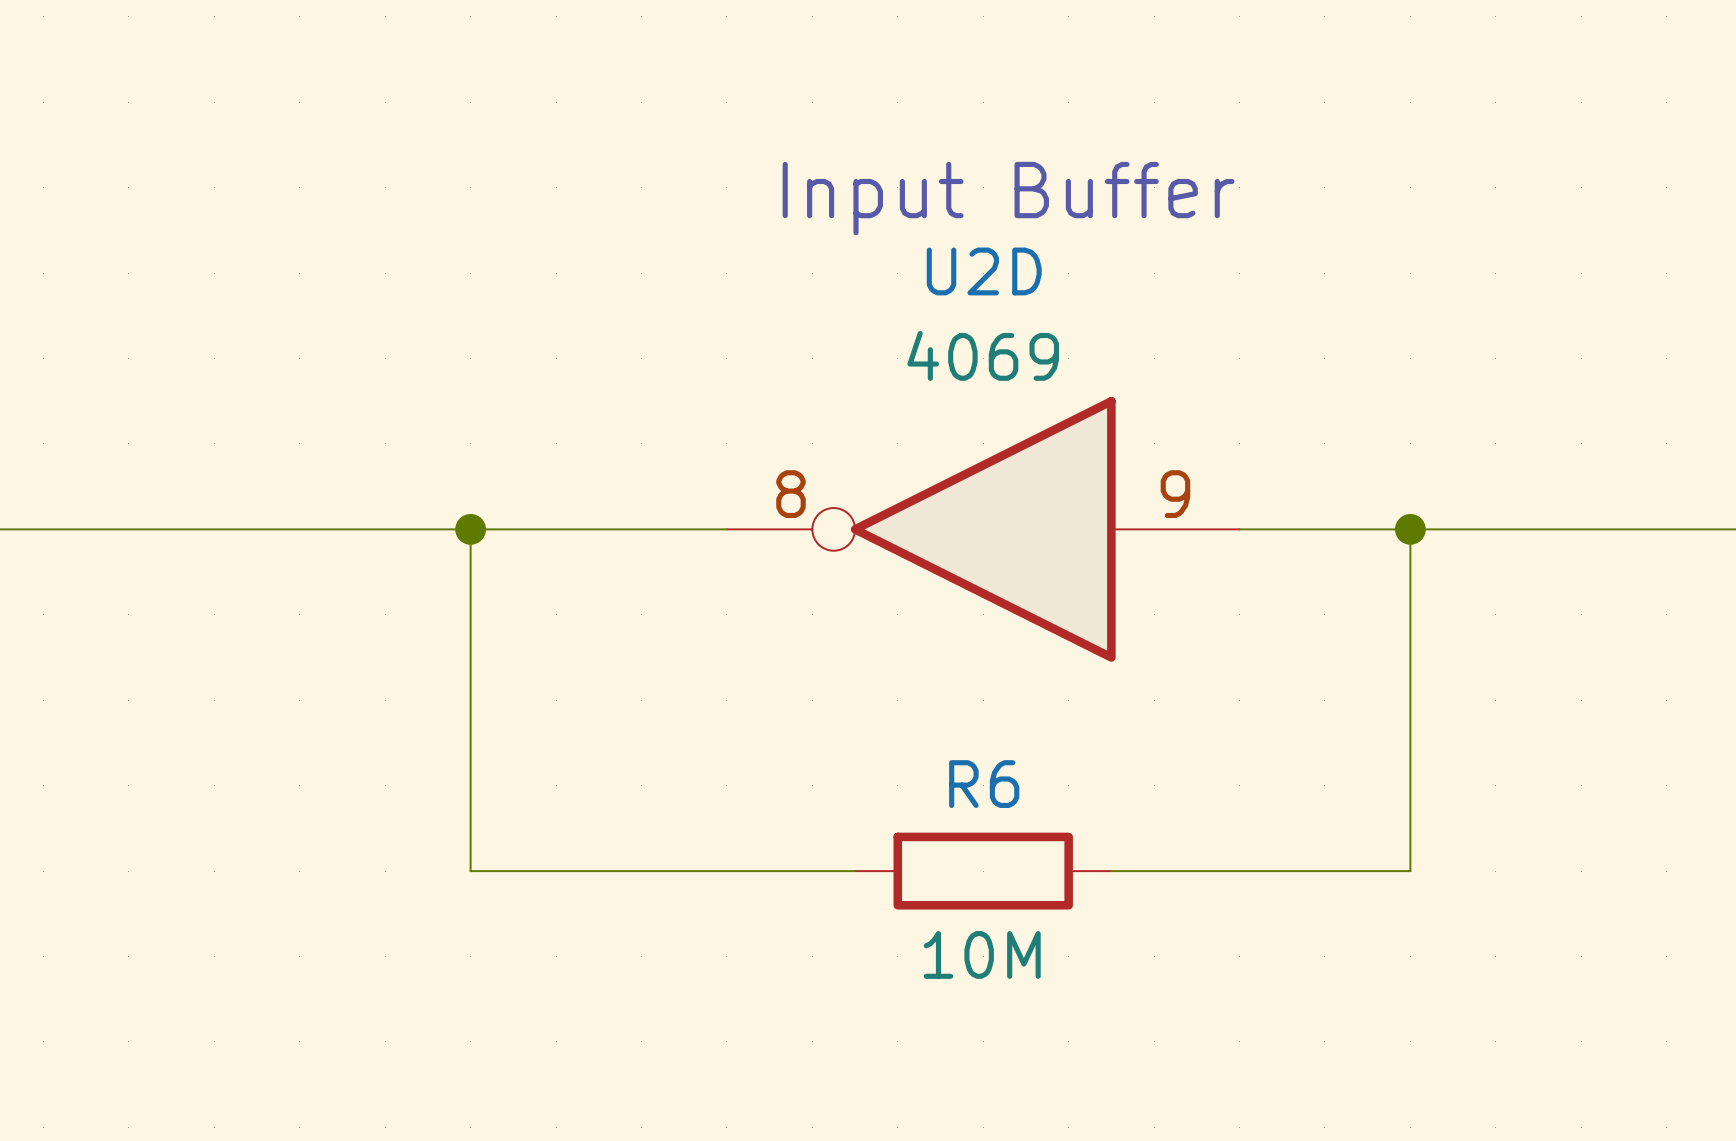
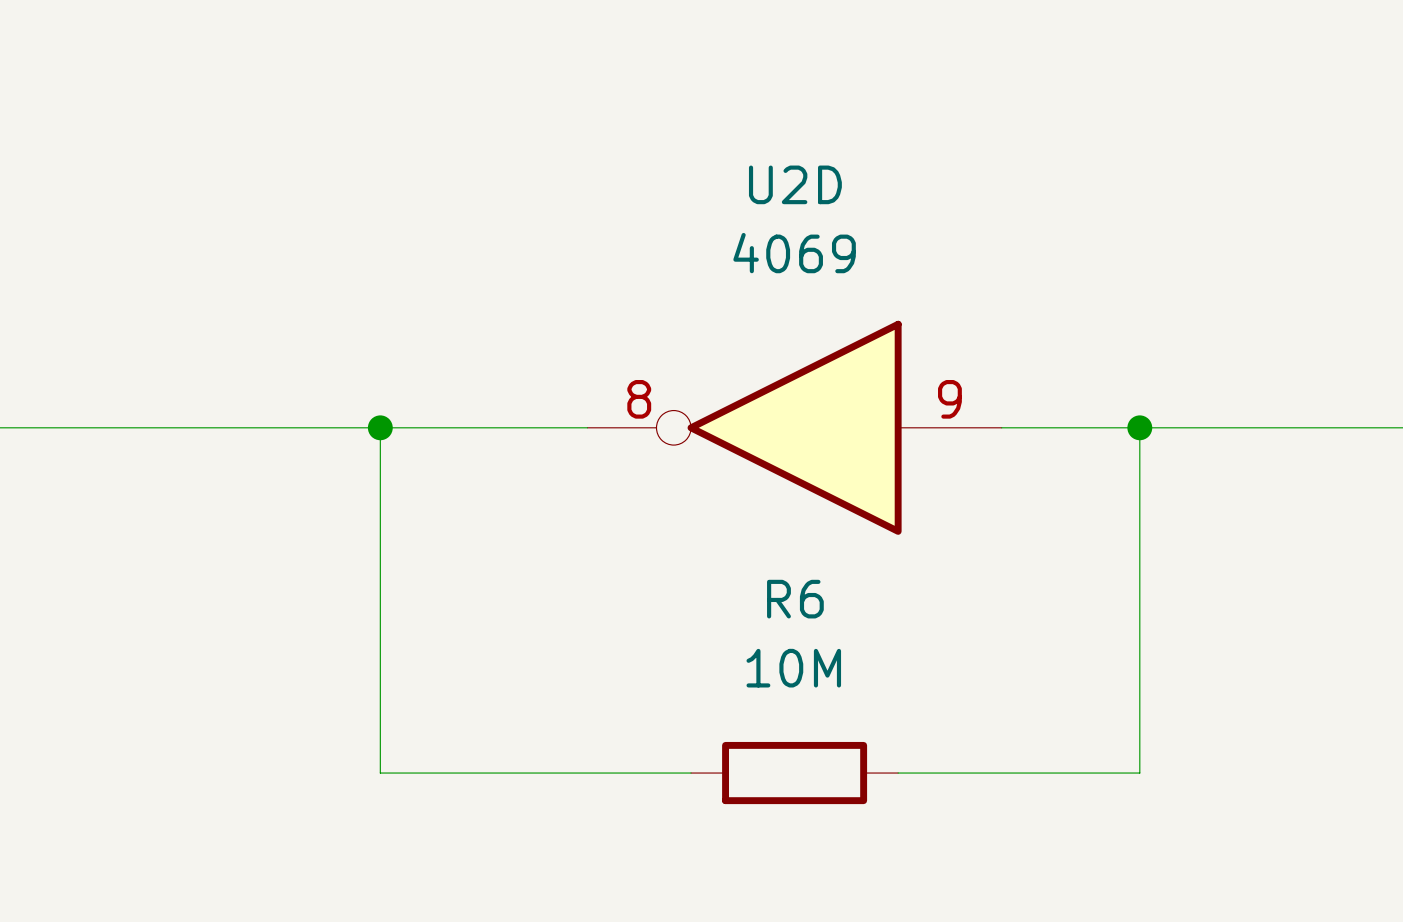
text: Input Buffer (1008, 198) -> none
U2D name position: U2D (984, 271) -> U2D (795, 184)
U2D value position: 4069 (983, 355) -> 4069 (794, 253)
R6 name position: R6 (984, 784) -> R6 (795, 599)
wire: (470, 871) (855, 871) -> (380, 703) (380, 773) (691, 773)
R6 position: (983, 871) -> (794, 773)
wire: (1111, 871) (1410, 871) -> (898, 773) (1139, 773) (1139, 703)
R6 value position: 10M (982, 954) -> 10M (793, 668)

